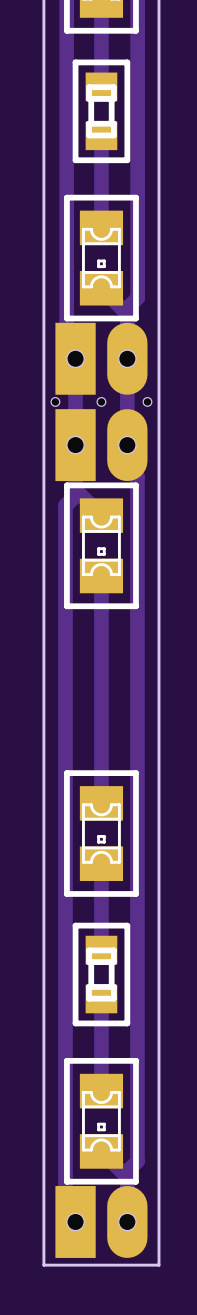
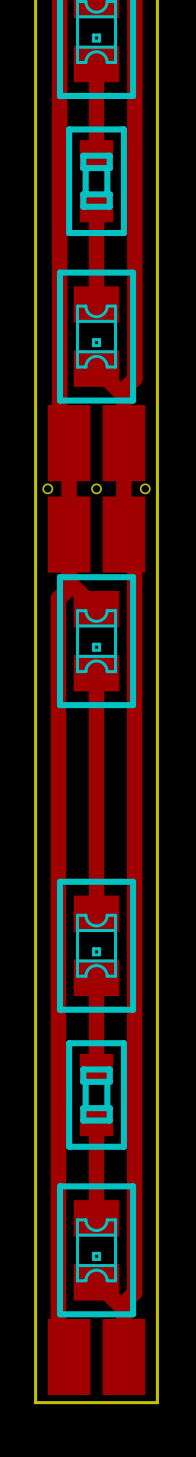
part footprint: [55, 322, 148, 395] -> [47, 405, 146, 482]
part footprint: [51, 397, 152, 482] -> [43, 484, 150, 573]
part footprint: [55, 1186, 148, 1258] -> [47, 1318, 146, 1396]

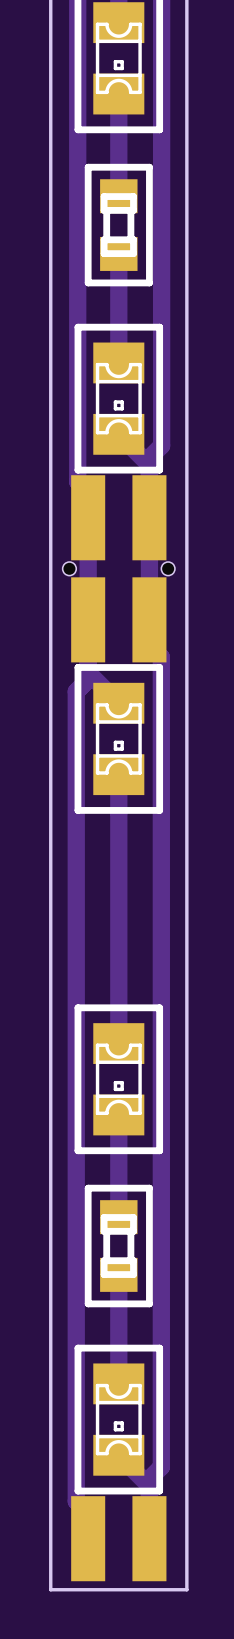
part footprint: [47, 405, 146, 482] -> [71, 475, 167, 561]
part footprint: [43, 484, 150, 573] -> [62, 562, 175, 663]
part footprint: [47, 1318, 146, 1396] -> [71, 1496, 167, 1582]

